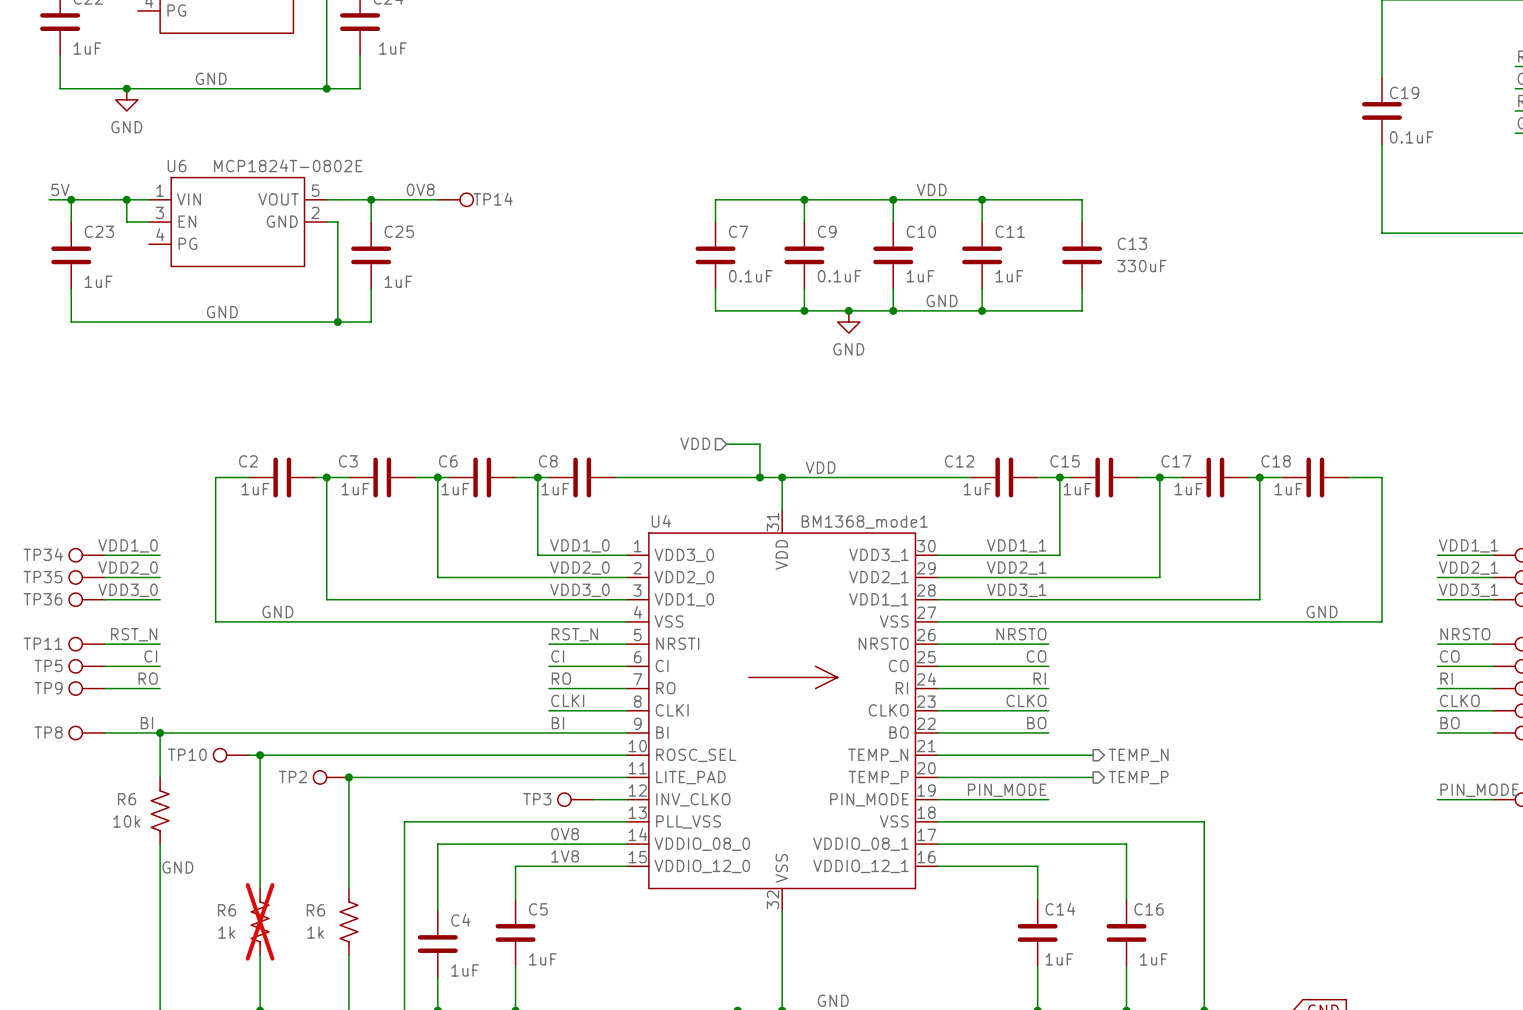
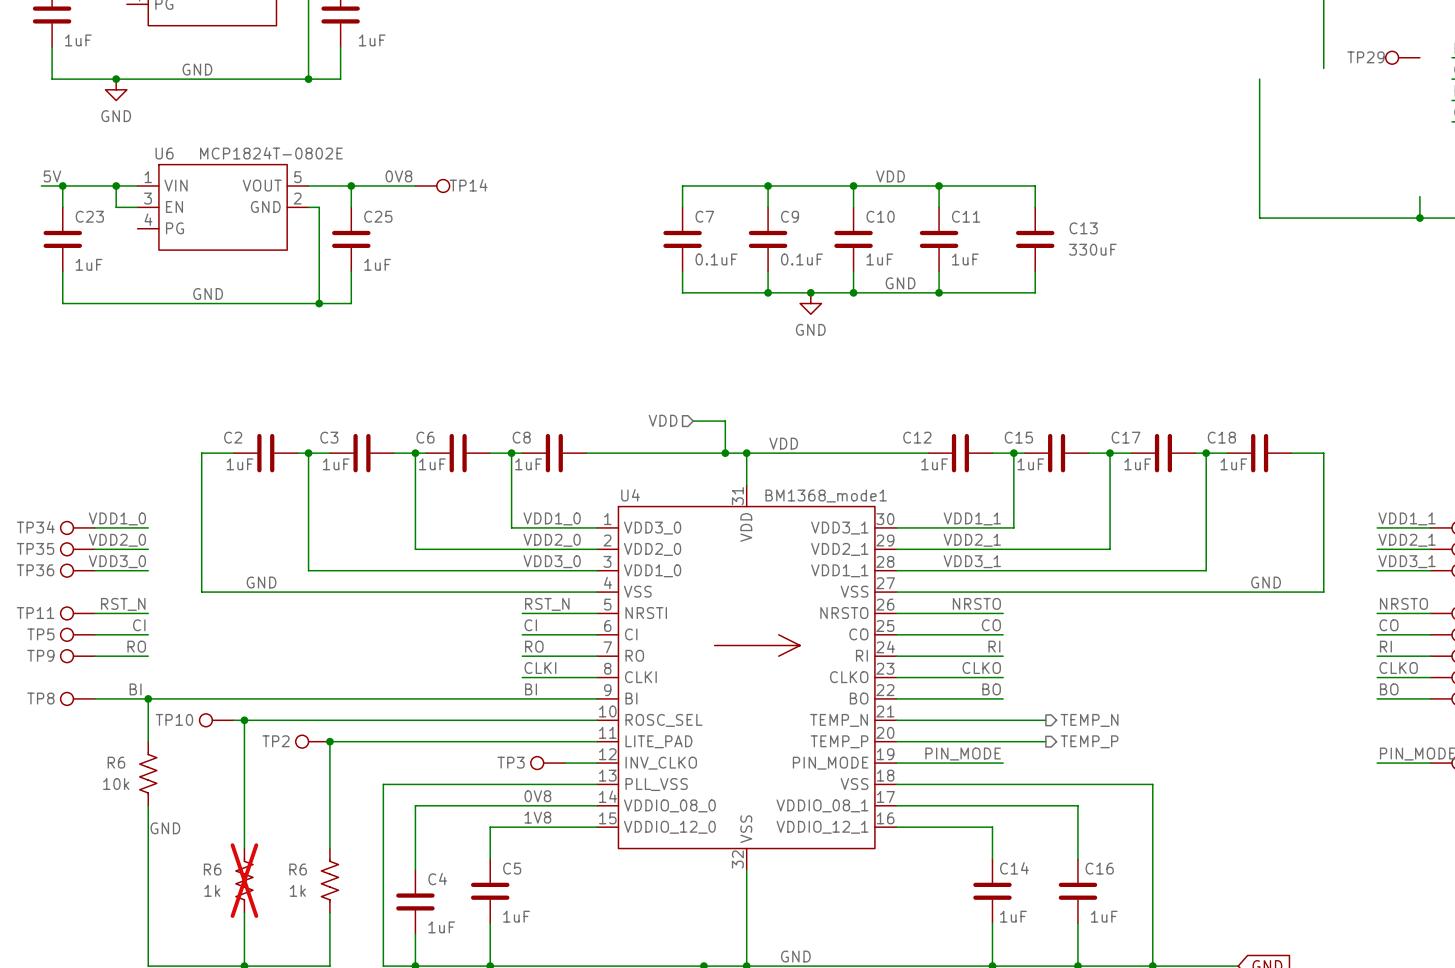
TP29: none -> (1402, 57)
C19: 0.1uF (1381, 110) -> none
wire: (1381, 144) (1381, 233) -> (1259, 79) (1259, 218) (1323, 218)
wire: none -> (1419, 196) (1419, 218)
junction: none -> (1419, 218)

